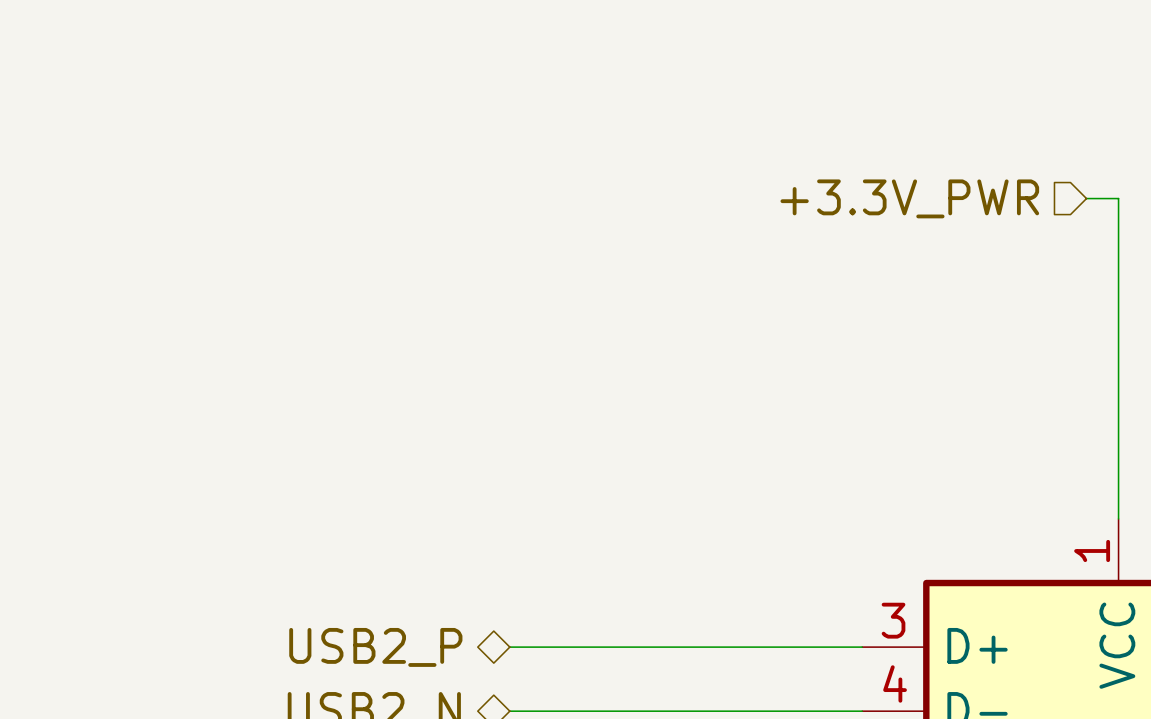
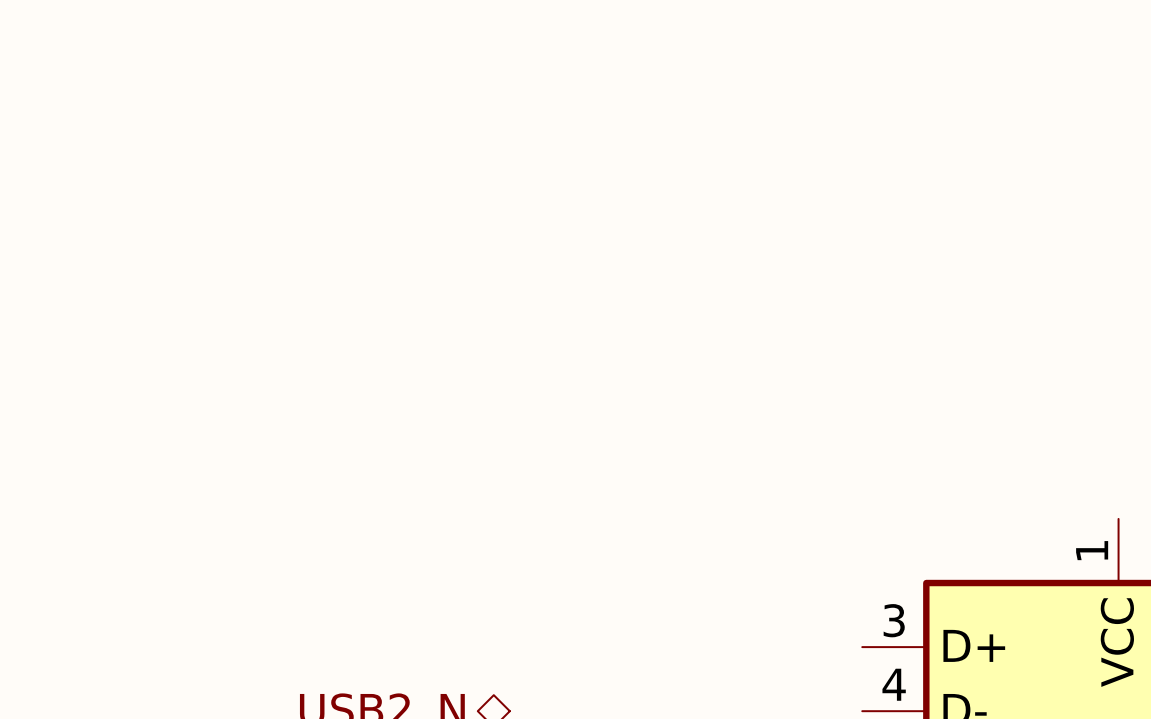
hierarchical label: +3.3V_PWR (909, 198) -> none
wire: (1086, 198) (1118, 198) (1118, 518) -> none
hierarchical label: USB2_P (375, 647) -> none
wire: (509, 647) (862, 647) -> none
wire: (509, 711) (862, 711) -> none

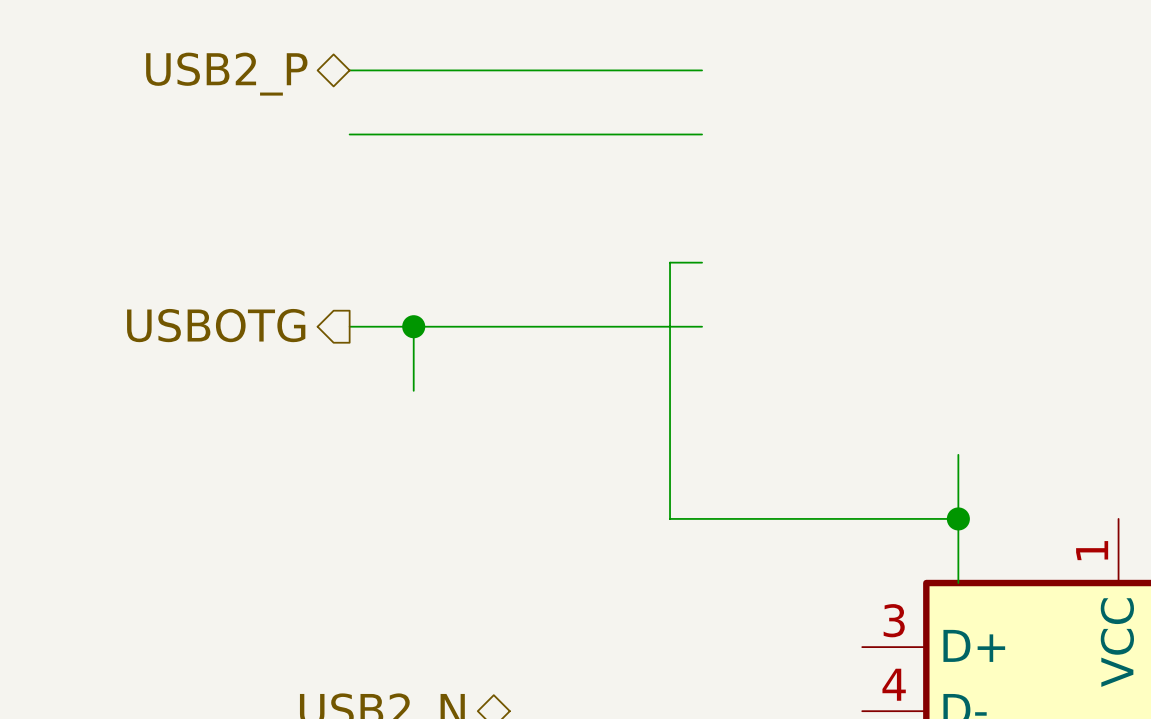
wire: none -> (349, 70) (702, 70)
hierarchical label: none -> USB2_P (226, 74)
wire: none -> (349, 134) (702, 134)
wire: none -> (702, 262) (670, 262) (670, 518) (958, 518)
hierarchical label: none -> USBOTG (216, 325)
wire: none -> (349, 326) (702, 326)
wire: none -> (413, 326) (413, 390)
junction: none -> (413, 326)
wire: none -> (958, 454) (958, 583)
junction: none -> (958, 518)

